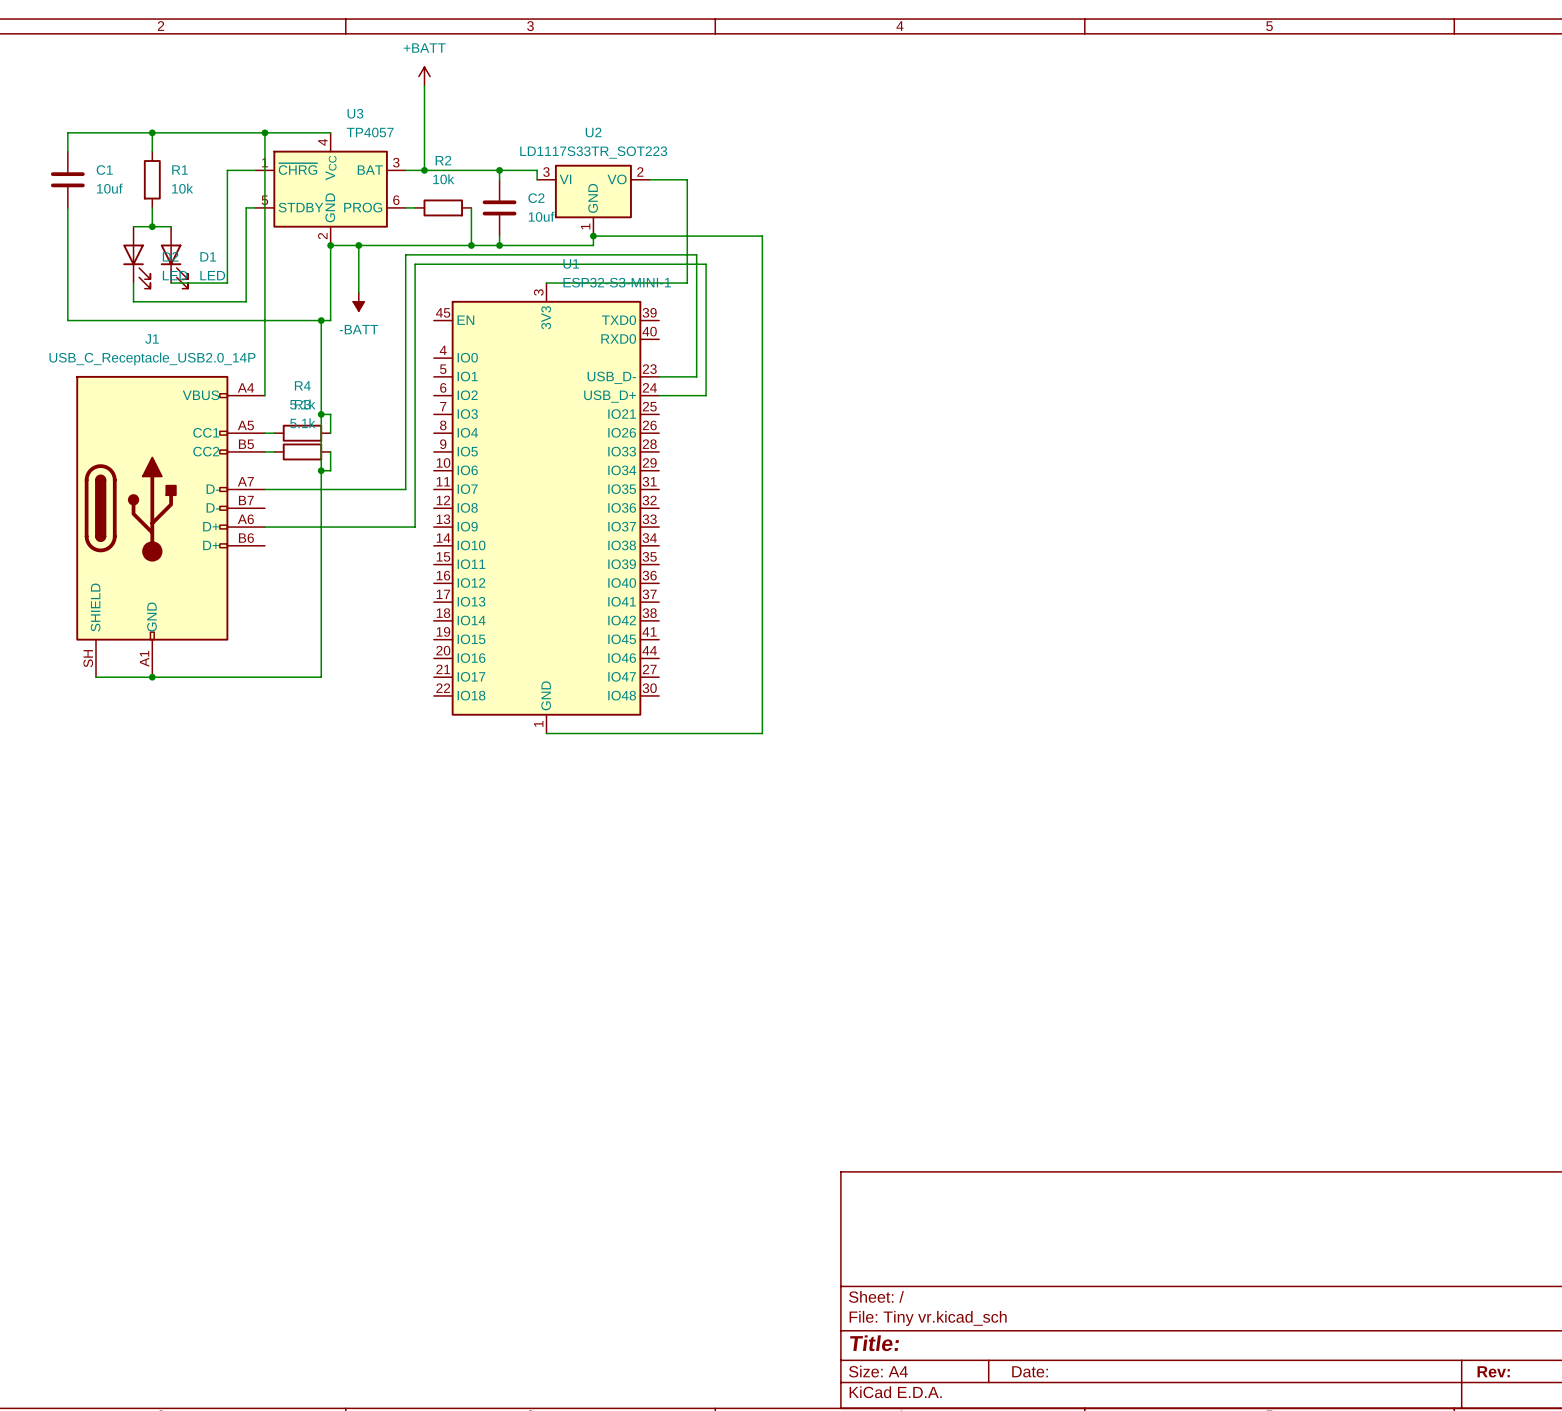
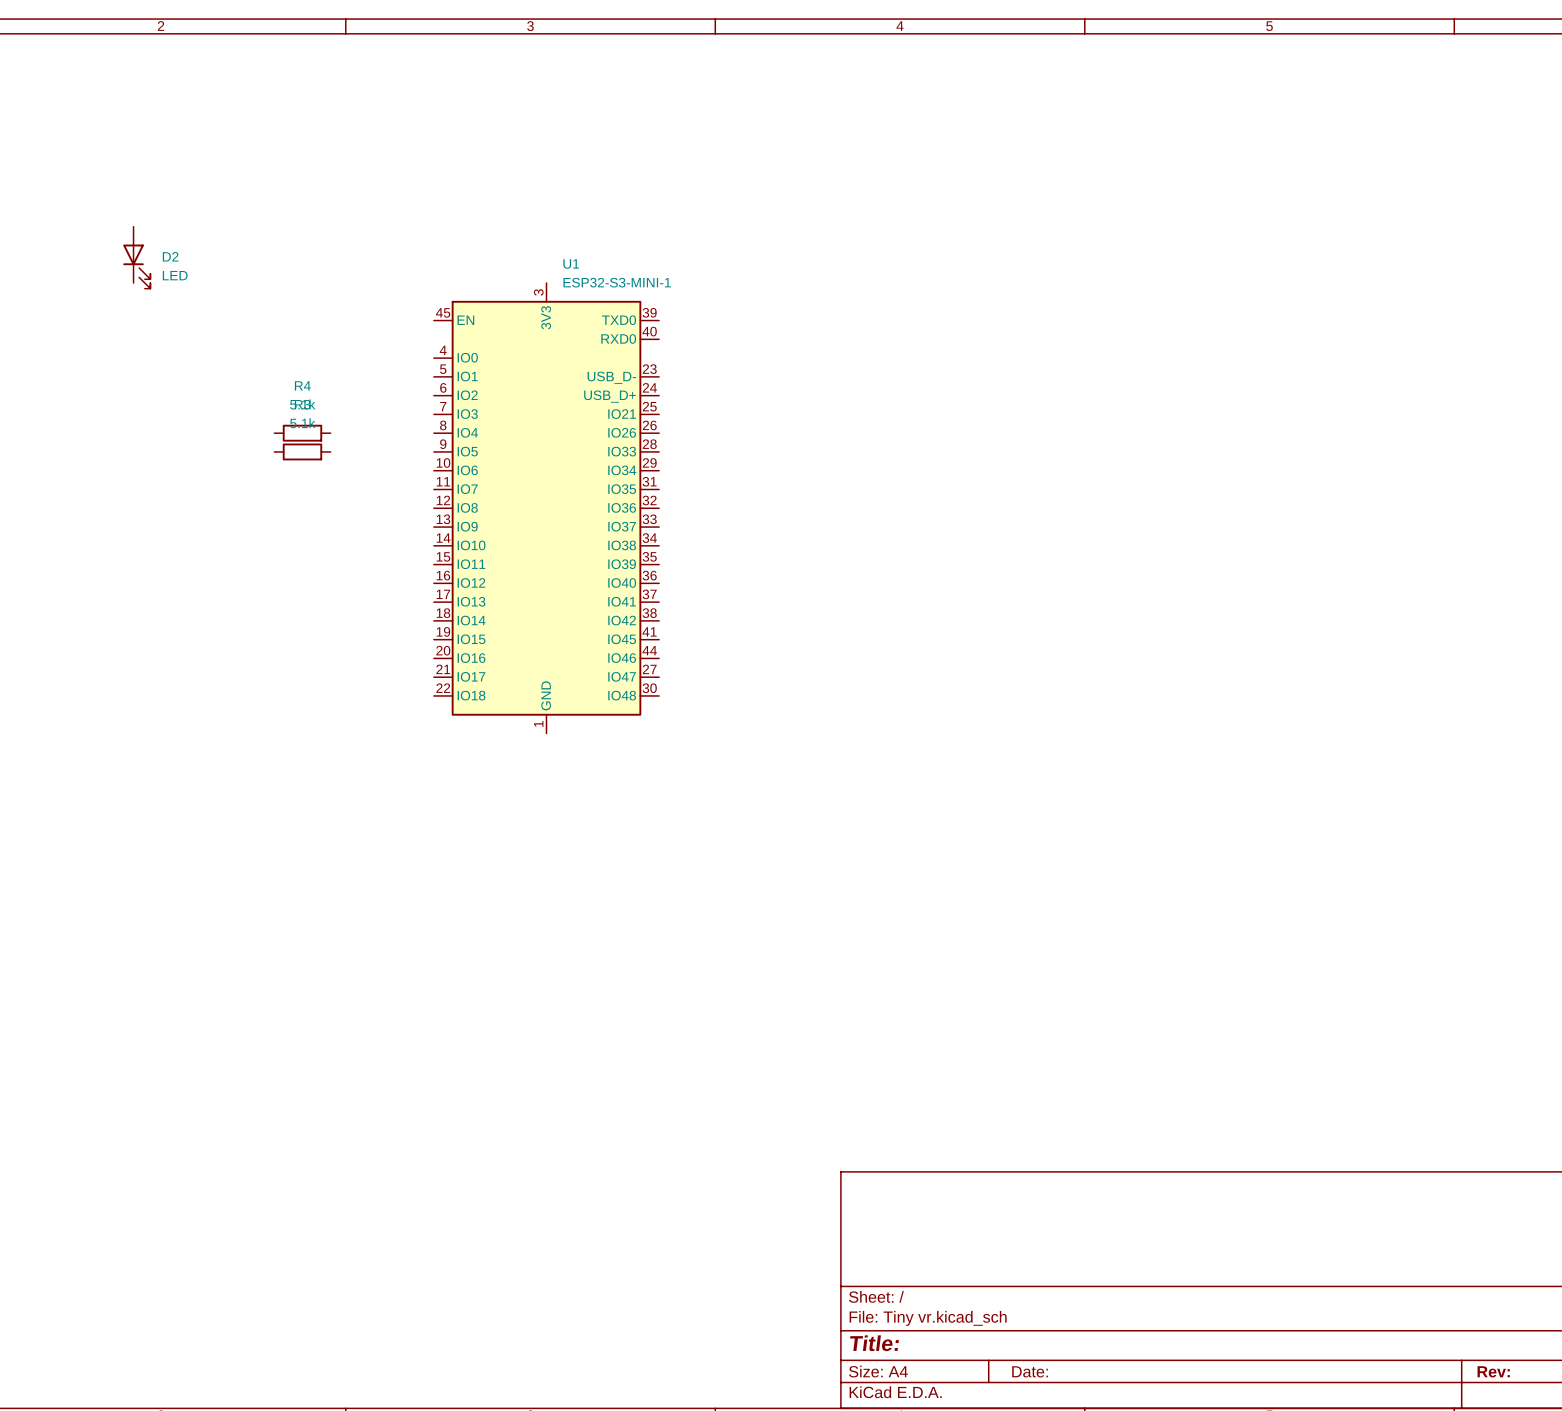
power symbol: +BATT (424, 76) -> none
wire: (424, 85) (424, 170) -> none
wire: (152, 132) (152, 151) -> none
junction: (152, 132) -> none
wire: (264, 132) (264, 395) -> none
junction: (264, 132) -> none
wire: (330, 132) (67, 132) (67, 151) -> none
wire: (255, 170) (227, 170) (227, 283) (171, 283) -> none
wire: (405, 170) (537, 170) (537, 179) -> none
junction: (424, 170) -> none
wire: (499, 170) (499, 179) -> none
junction: (499, 170) -> none
C1: 10uf (67, 179) -> none
R1: 10k (152, 179) -> none
wire: (649, 179) (687, 179) (687, 283) (546, 283) -> none
U3: TP4057 (330, 189) -> none
U2: LD1117S33TR_SOT223 (593, 200) -> none
wire: (67, 207) (67, 320) (330, 320) (330, 245) (593, 245) (593, 236) (762, 236) (762, 733) (546, 733) -> none
wire: (152, 207) (152, 226) -> none
wire: (255, 207) (246, 207) (246, 301) (133, 301) (133, 283) -> none
wire: (405, 207) (415, 207) -> none
R2: 10k (443, 207) -> none
wire: (471, 207) (471, 245) -> none
C2: 10uf (499, 207) -> none
wire: (133, 226) (171, 226) -> none
junction: (152, 226) -> none
wire: (499, 236) (499, 245) -> none
junction: (593, 236) -> none
junction: (330, 245) -> none
wire: (358, 245) (358, 292) -> none
junction: (358, 245) -> none
junction: (471, 245) -> none
junction: (499, 245) -> none
D1: LED (174, 257) -> none
power symbol: -BATT (358, 301) -> none
wire: (321, 320) (321, 677) (96, 677) -> none
junction: (321, 320) -> none
wire: (659, 376) (696, 376) (696, 254) (405, 254) (405, 489) (264, 489) -> none
wire: (659, 395) (706, 395) (706, 264) (415, 264) (415, 527) (264, 527) -> none
wire: (321, 414) (330, 414) (330, 433) -> none
junction: (321, 414) -> none
wire: (264, 433) (274, 433) -> none
wire: (264, 451) (274, 451) -> none
wire: (330, 451) (330, 470) (321, 470) -> none
junction: (321, 470) -> none
J1: USB_C_Receptacle_USB2.0_14P (170, 526) -> none
junction: (152, 677) -> none

